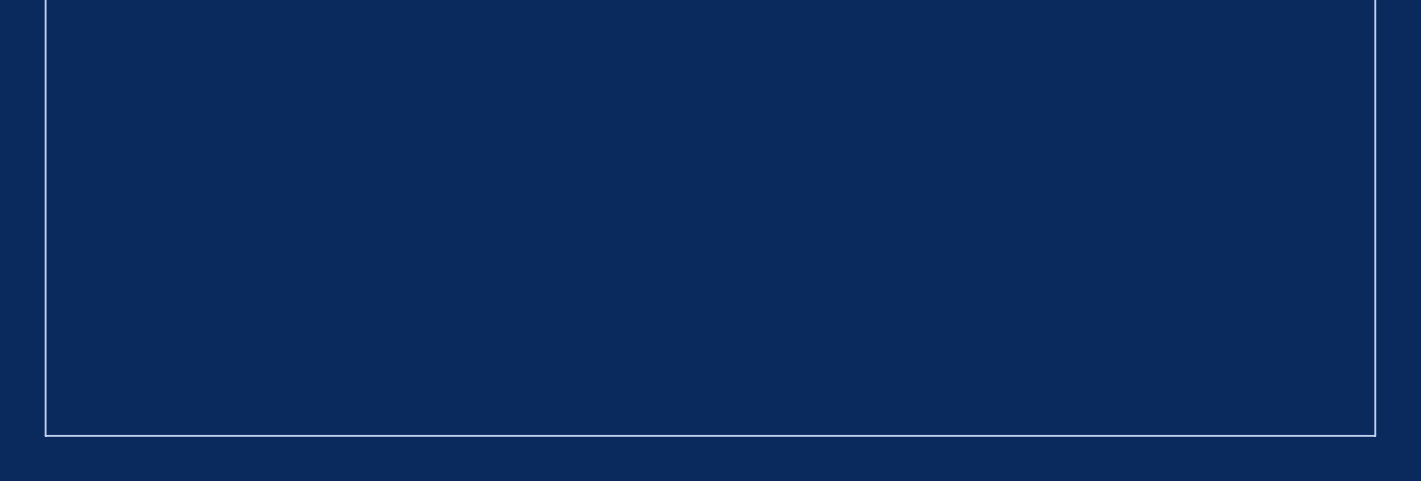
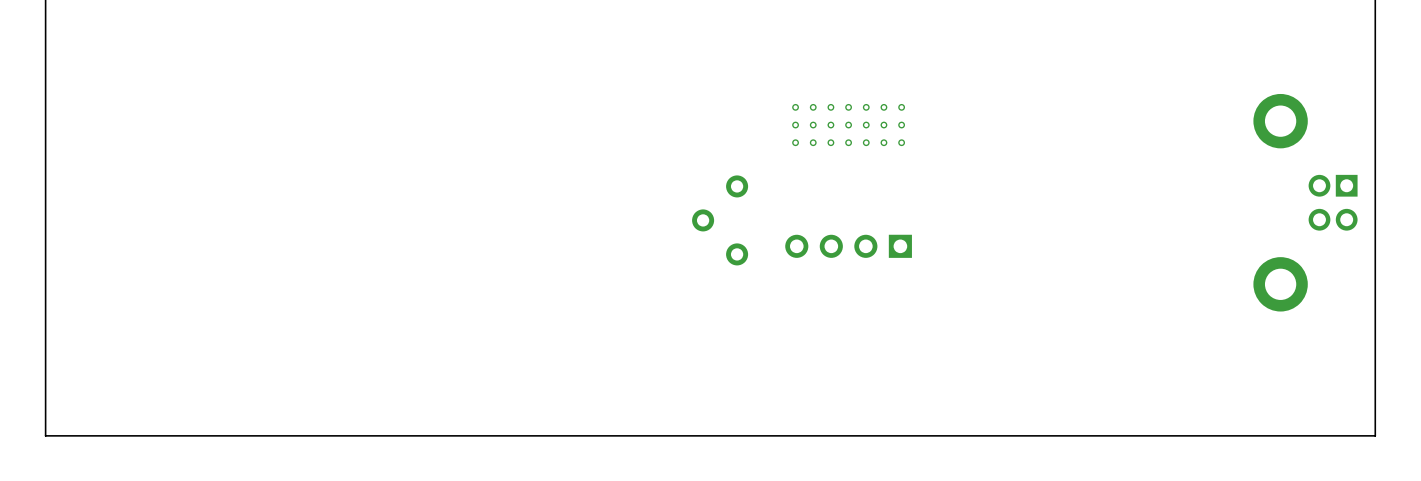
part: none -> (848, 125)
part: none -> (1305, 202)
part: none -> (720, 220)
part: none -> (848, 246)

